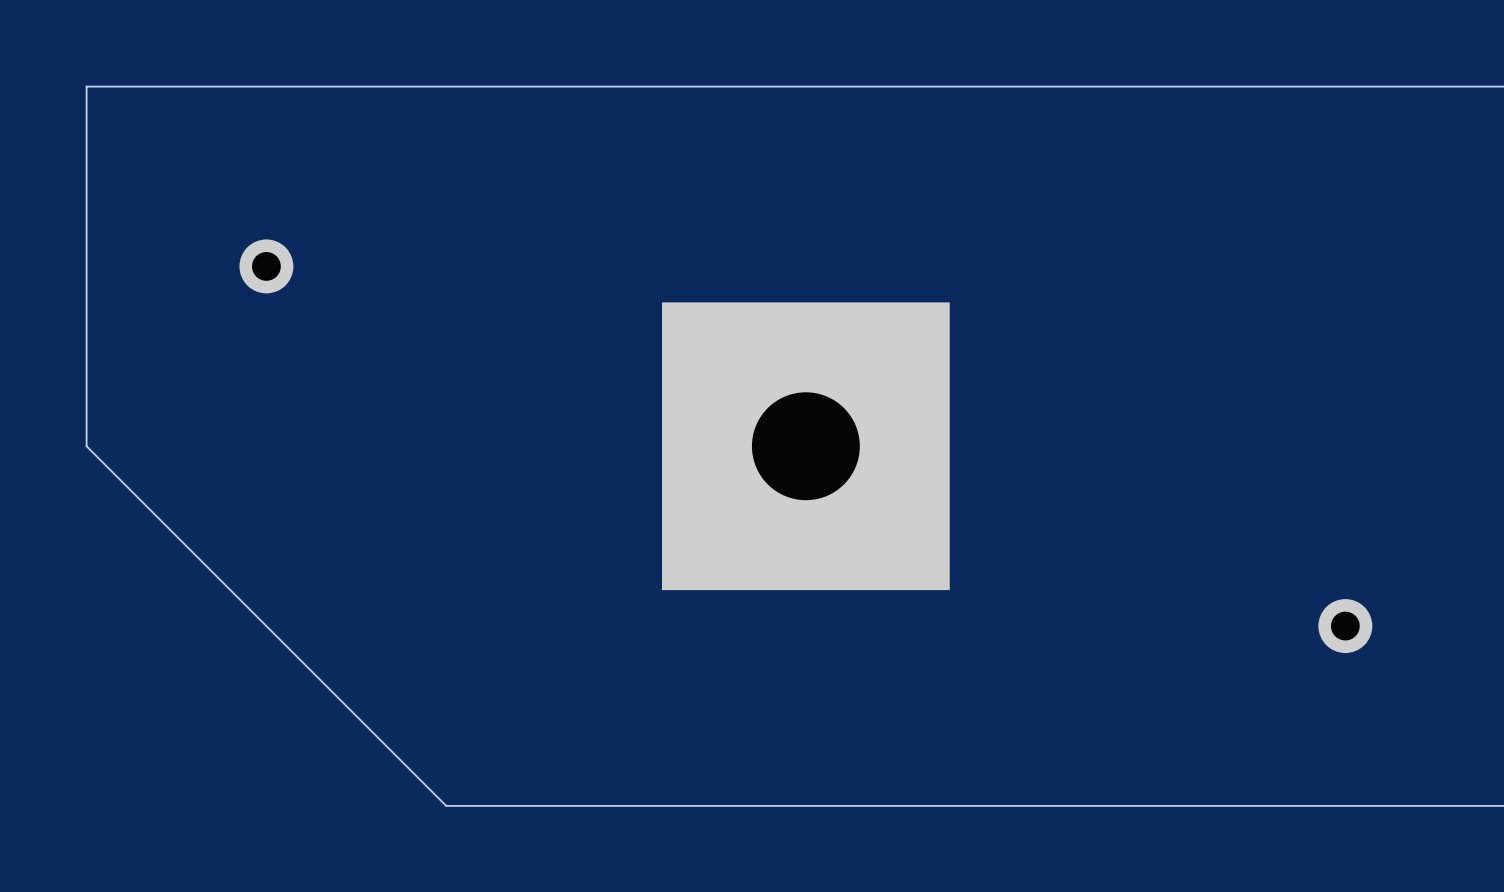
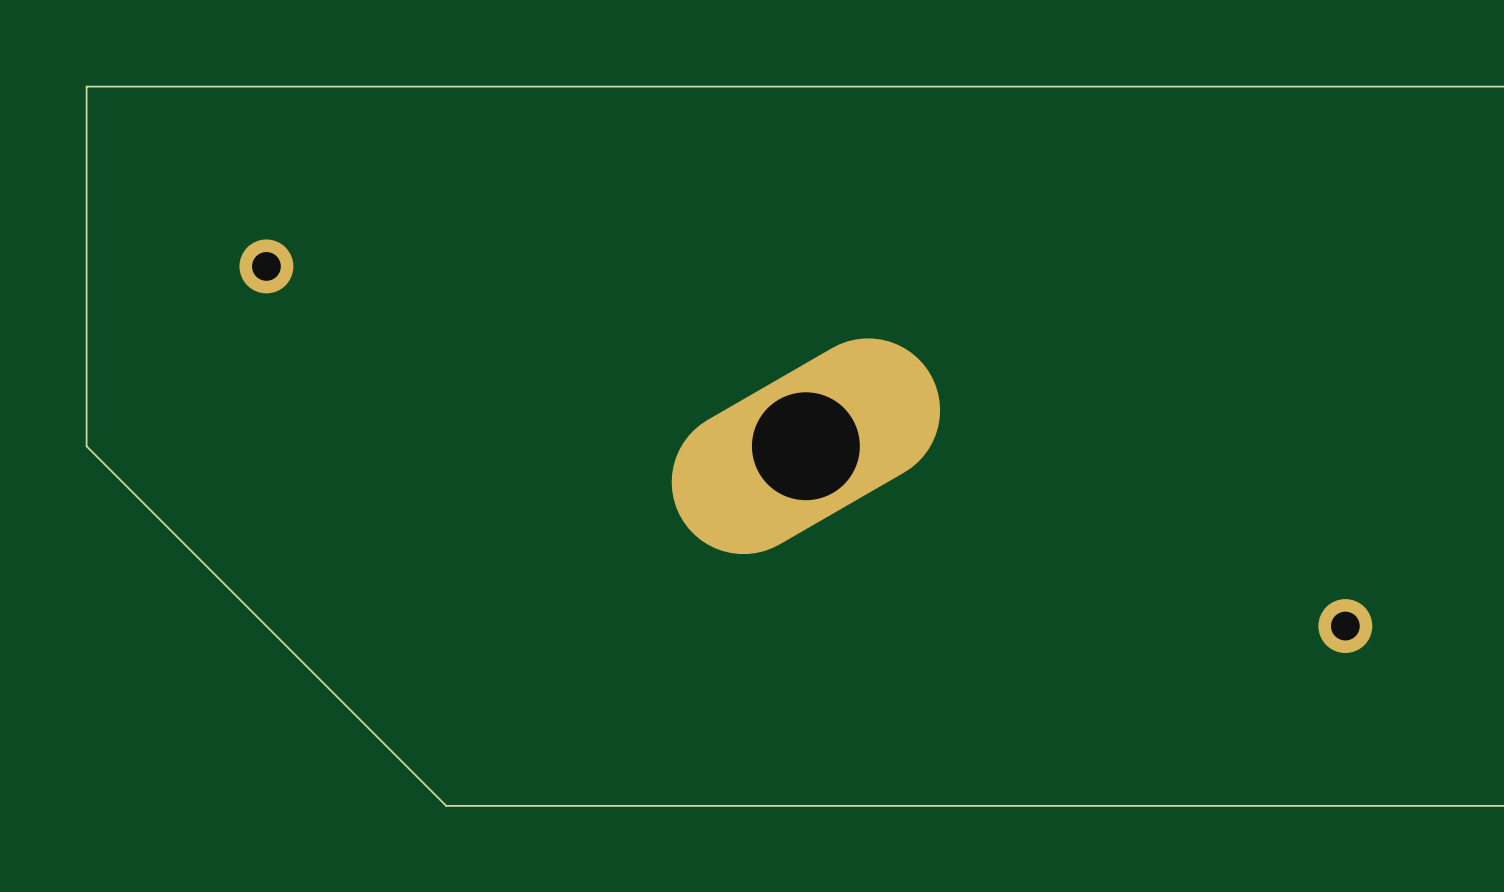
part footprint: [662, 302, 950, 591] -> [671, 338, 941, 555]

